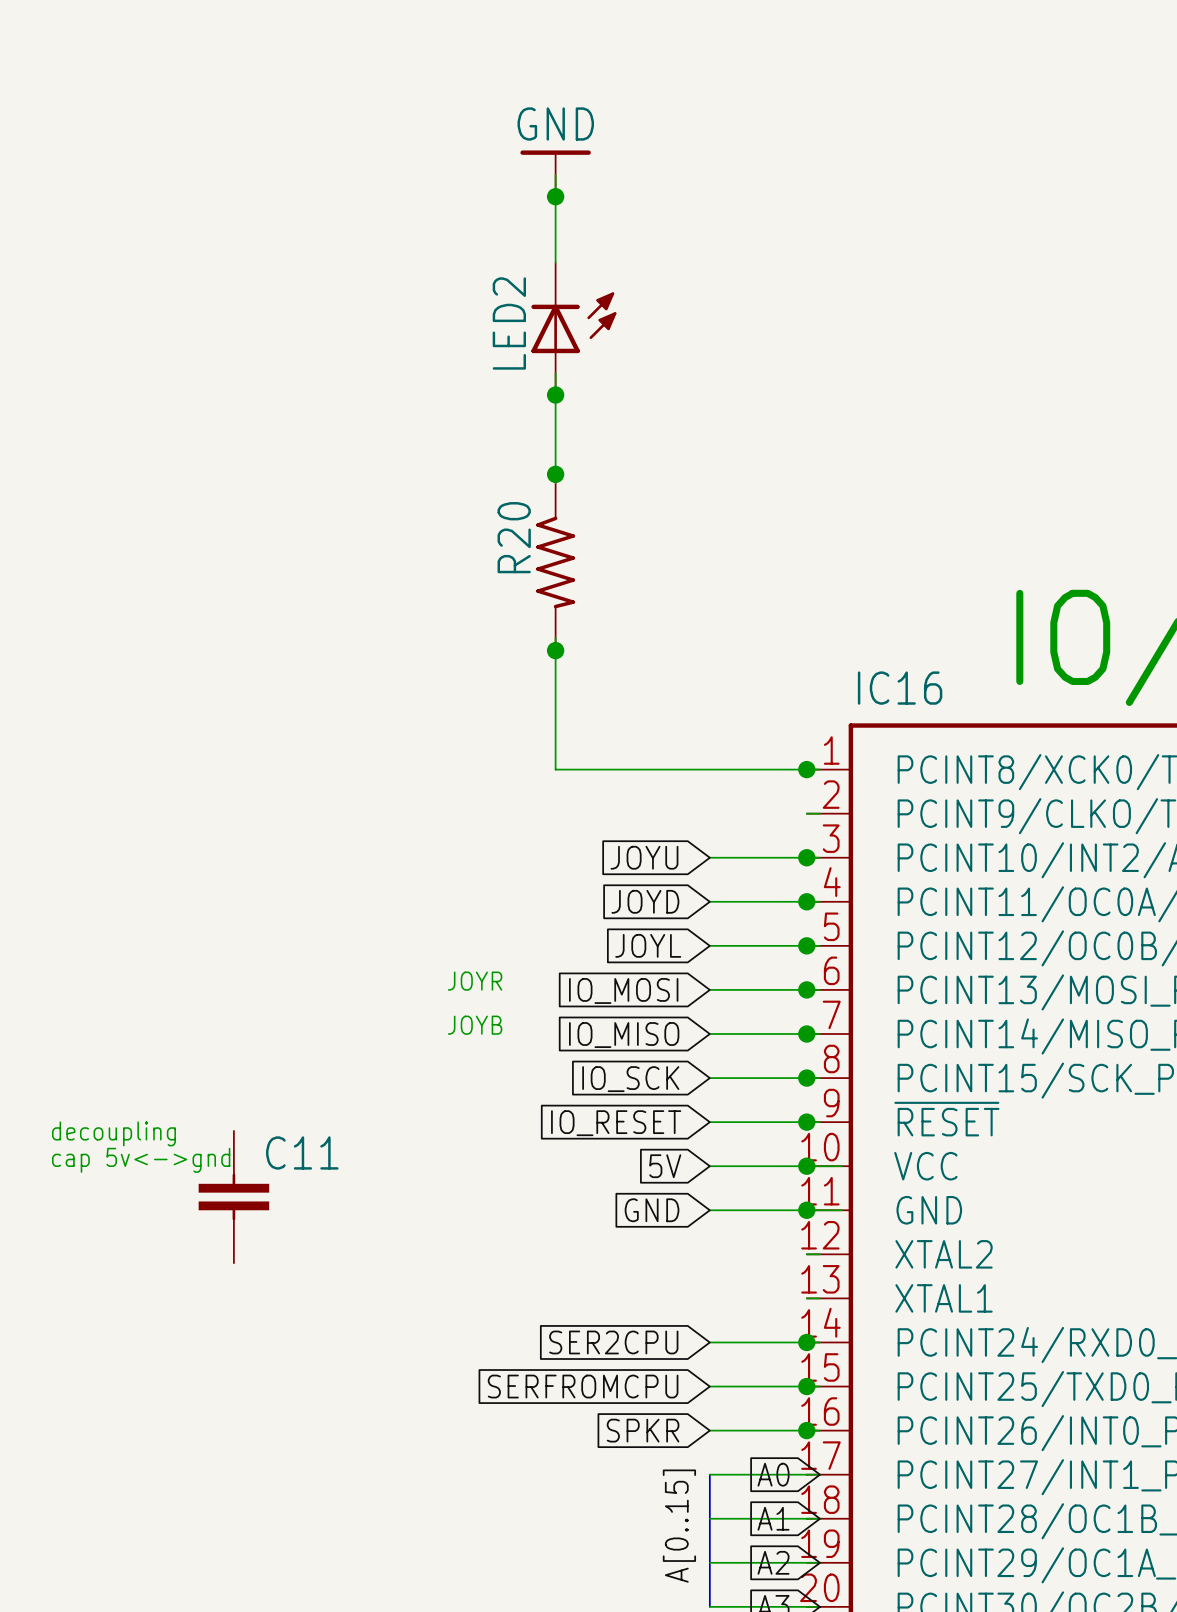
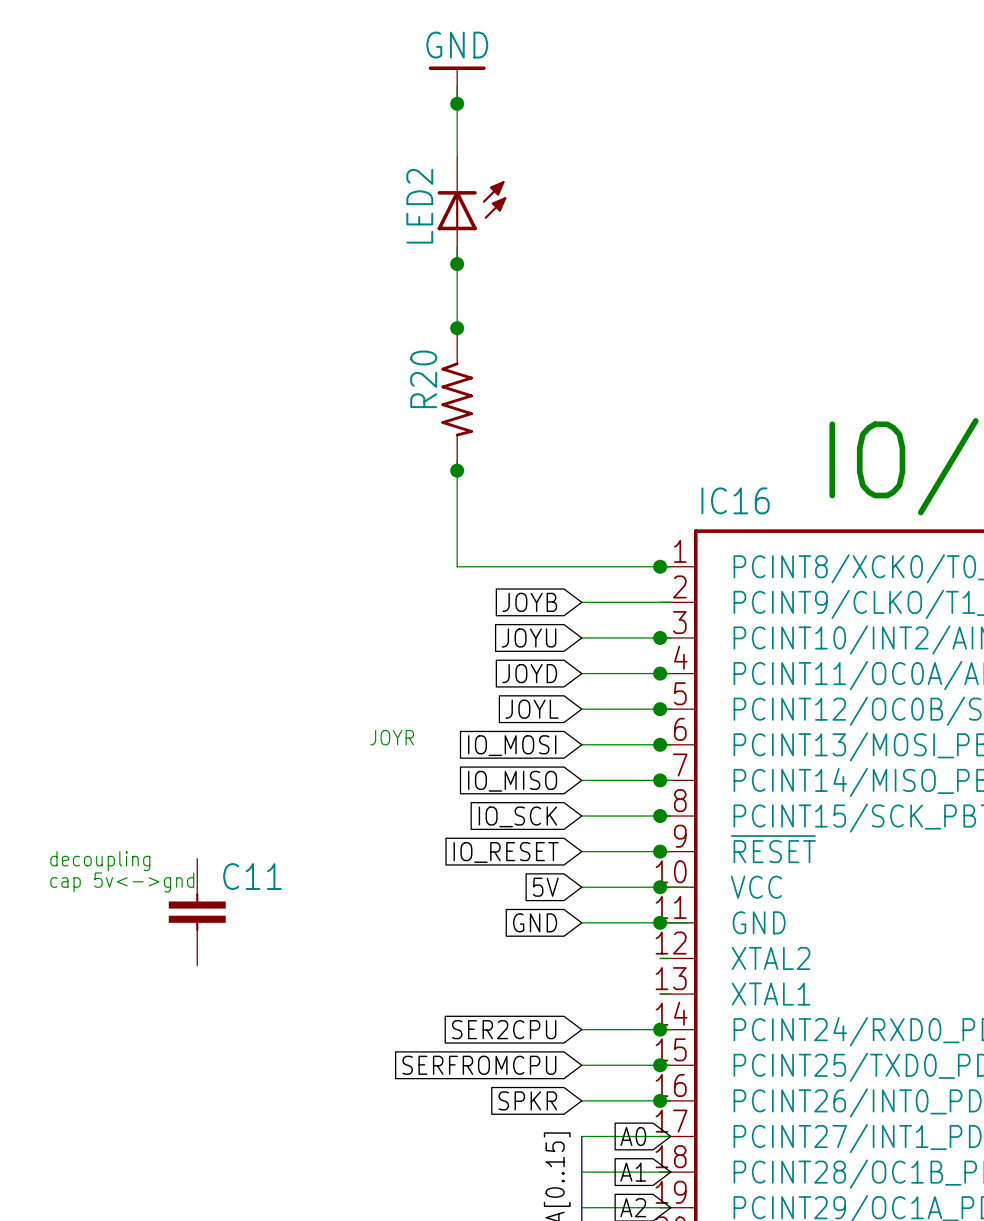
global label: none -> JOYB (529, 602)
wire: none -> (581, 602) (660, 602)
text: JOYB (475, 1025) -> none

